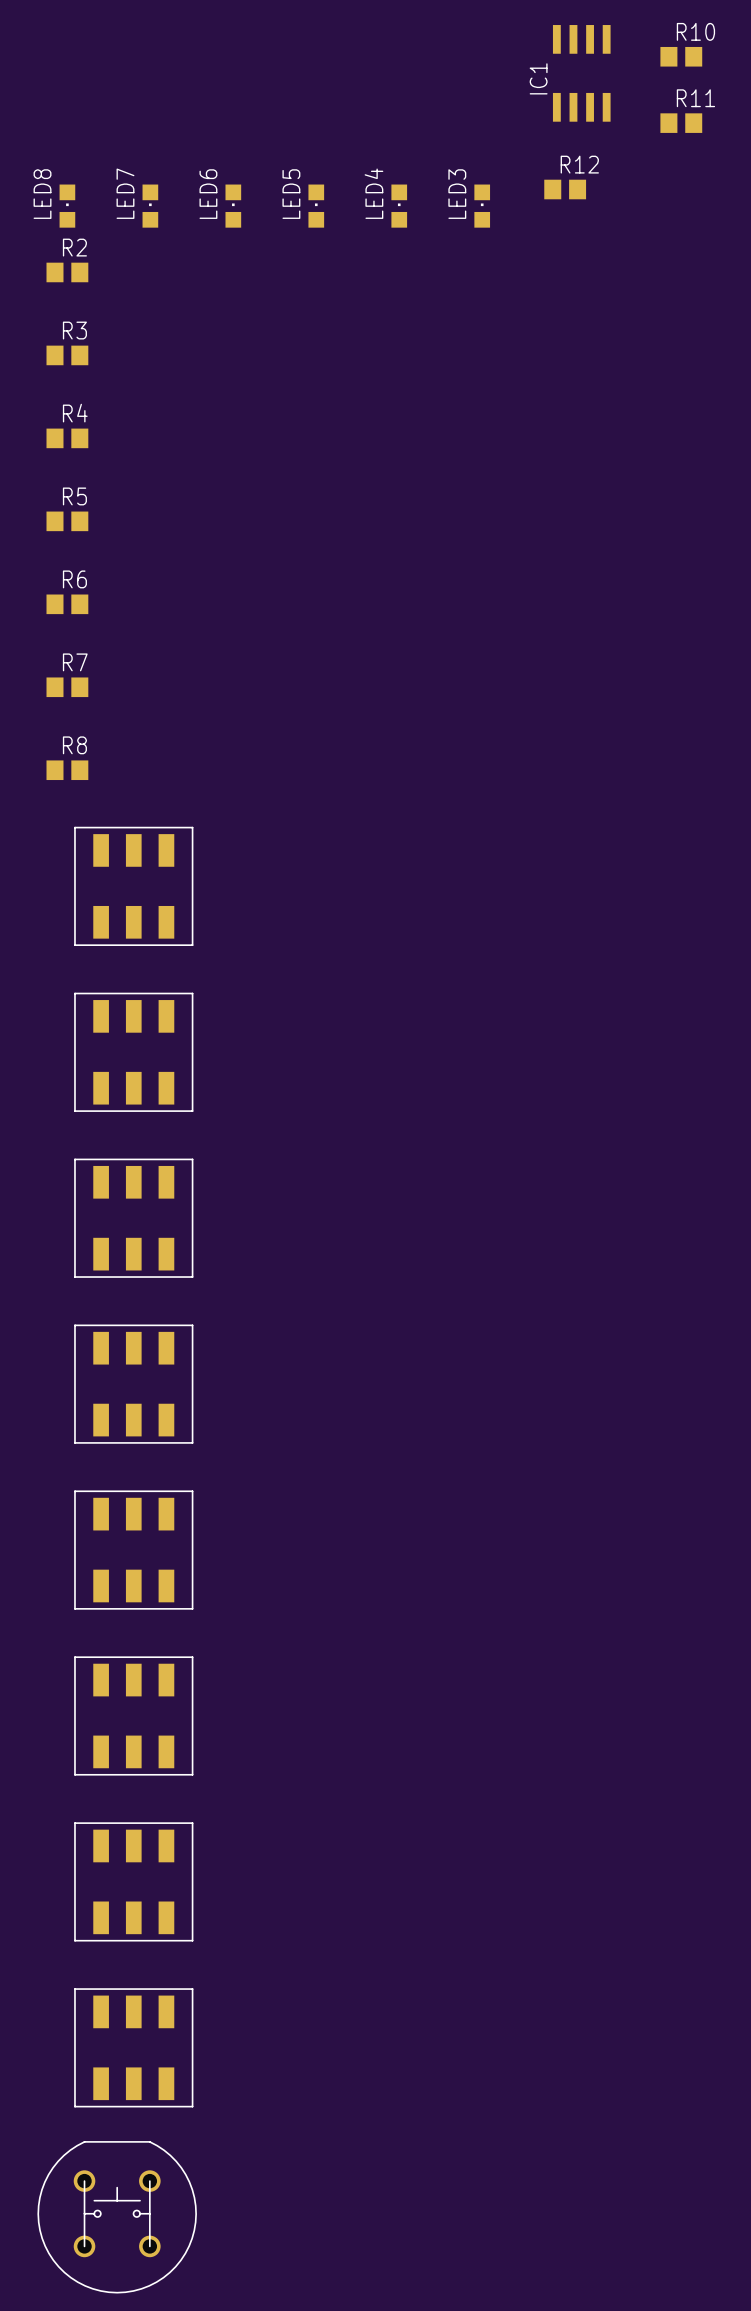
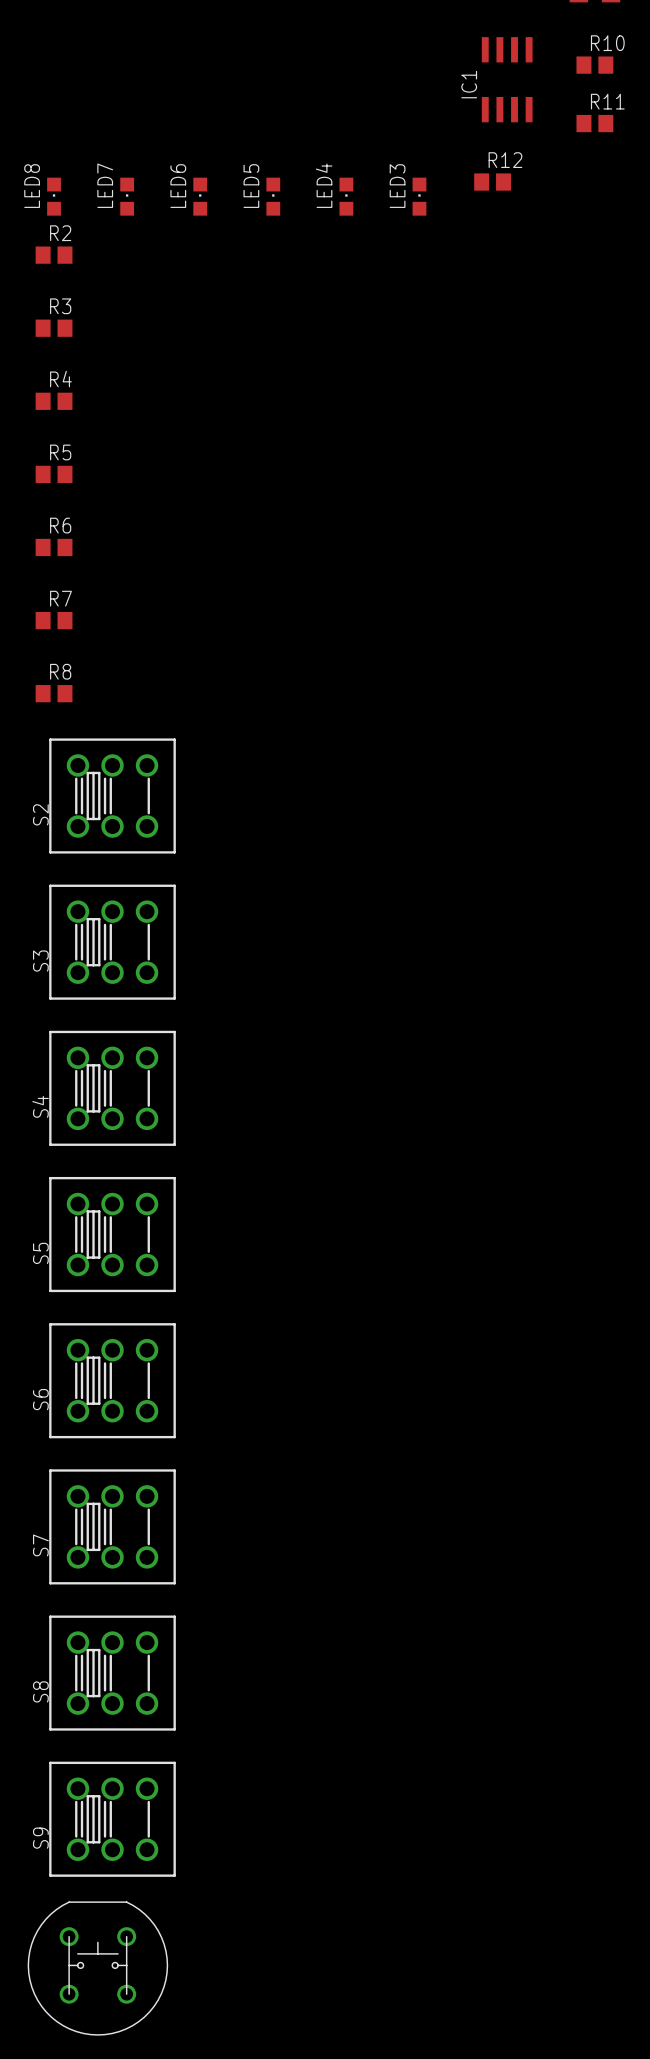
part: (133, 886) -> none
S2: none -> (112, 795)
part: (133, 1052) -> none
S3: none -> (112, 942)
part: (133, 1218) -> none
S4: none -> (112, 1088)
part: (133, 1384) -> none
S5: none -> (112, 1234)
part: (133, 1550) -> none
S6: none -> (112, 1380)
part: (133, 1715) -> none
S7: none -> (112, 1526)
part: (133, 1881) -> none
S8: none -> (112, 1673)
part: (133, 2047) -> none
S9: none -> (112, 1819)

